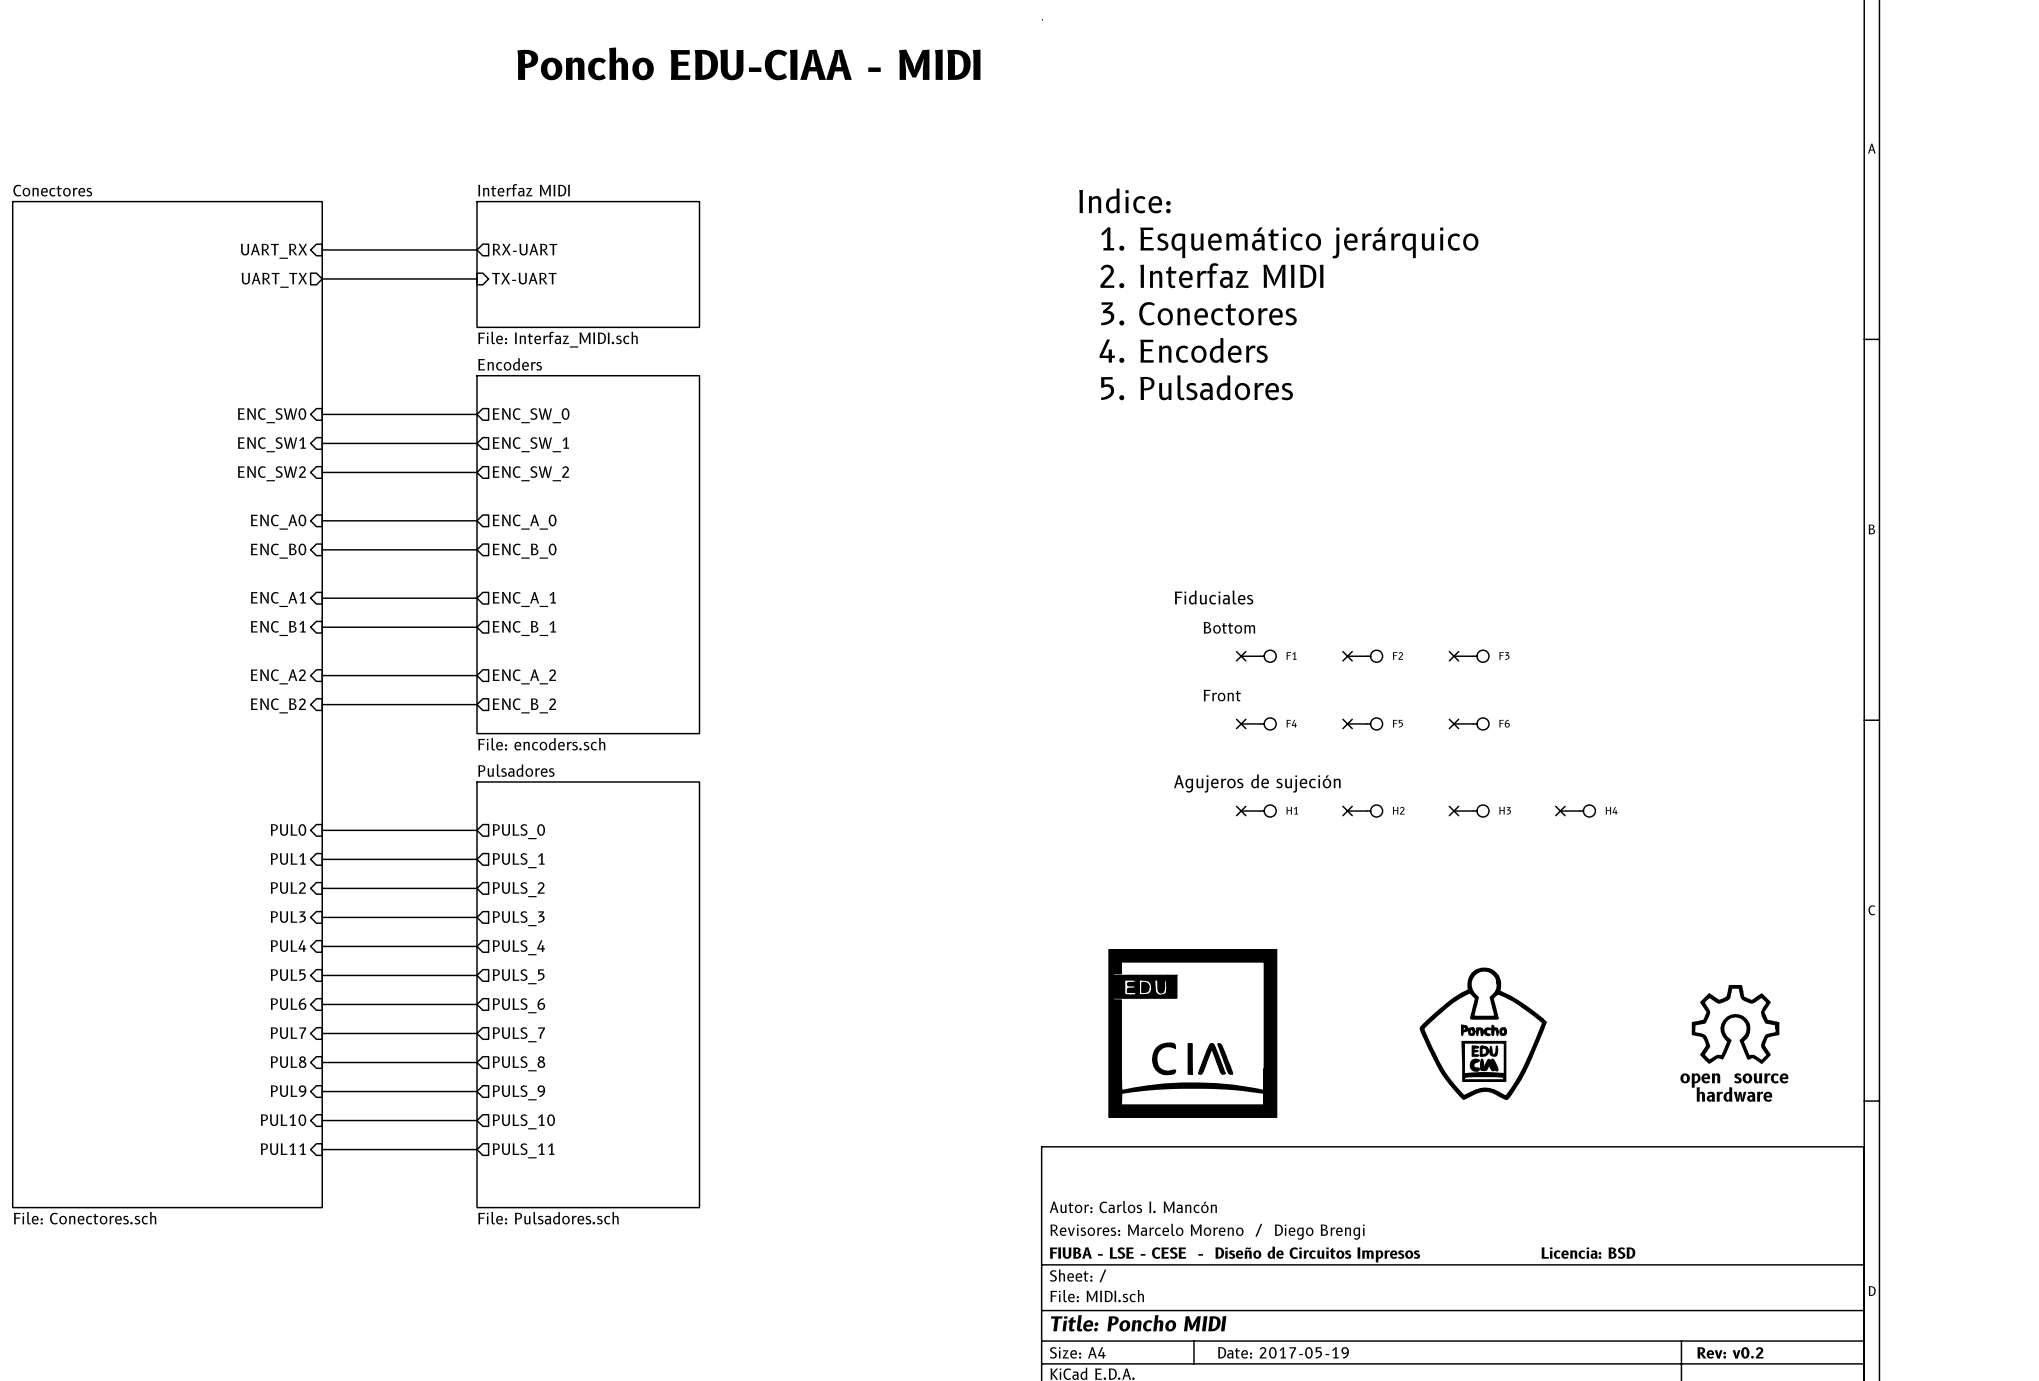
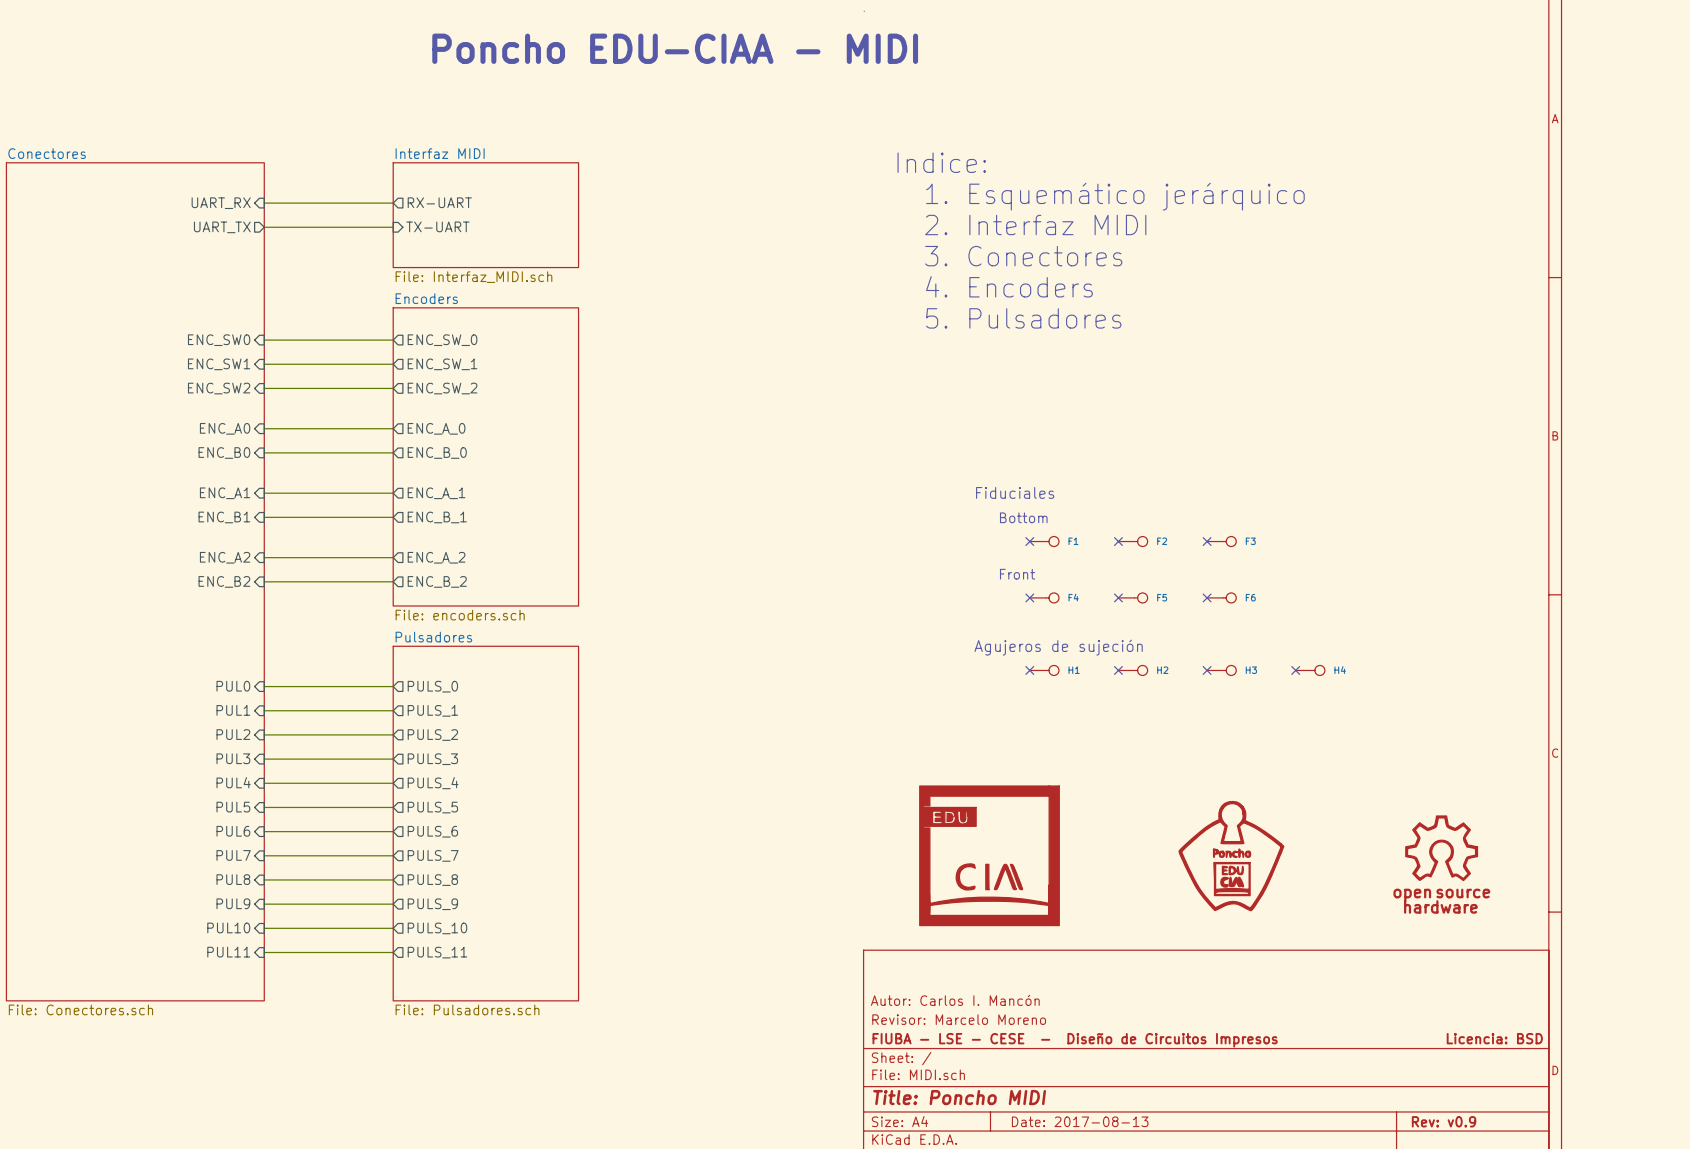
title block: Revisores: Marcelo Moreno / Diego Brengi (1207, 1231) -> Revisor: Marcelo Moreno (959, 1019)
title block: Date: 2017-05-19 (1283, 1352) -> Date: 2017-08-13 (1080, 1121)
title block: Rev: v0.2 (1730, 1352) -> Rev: v0.9 (1444, 1121)

